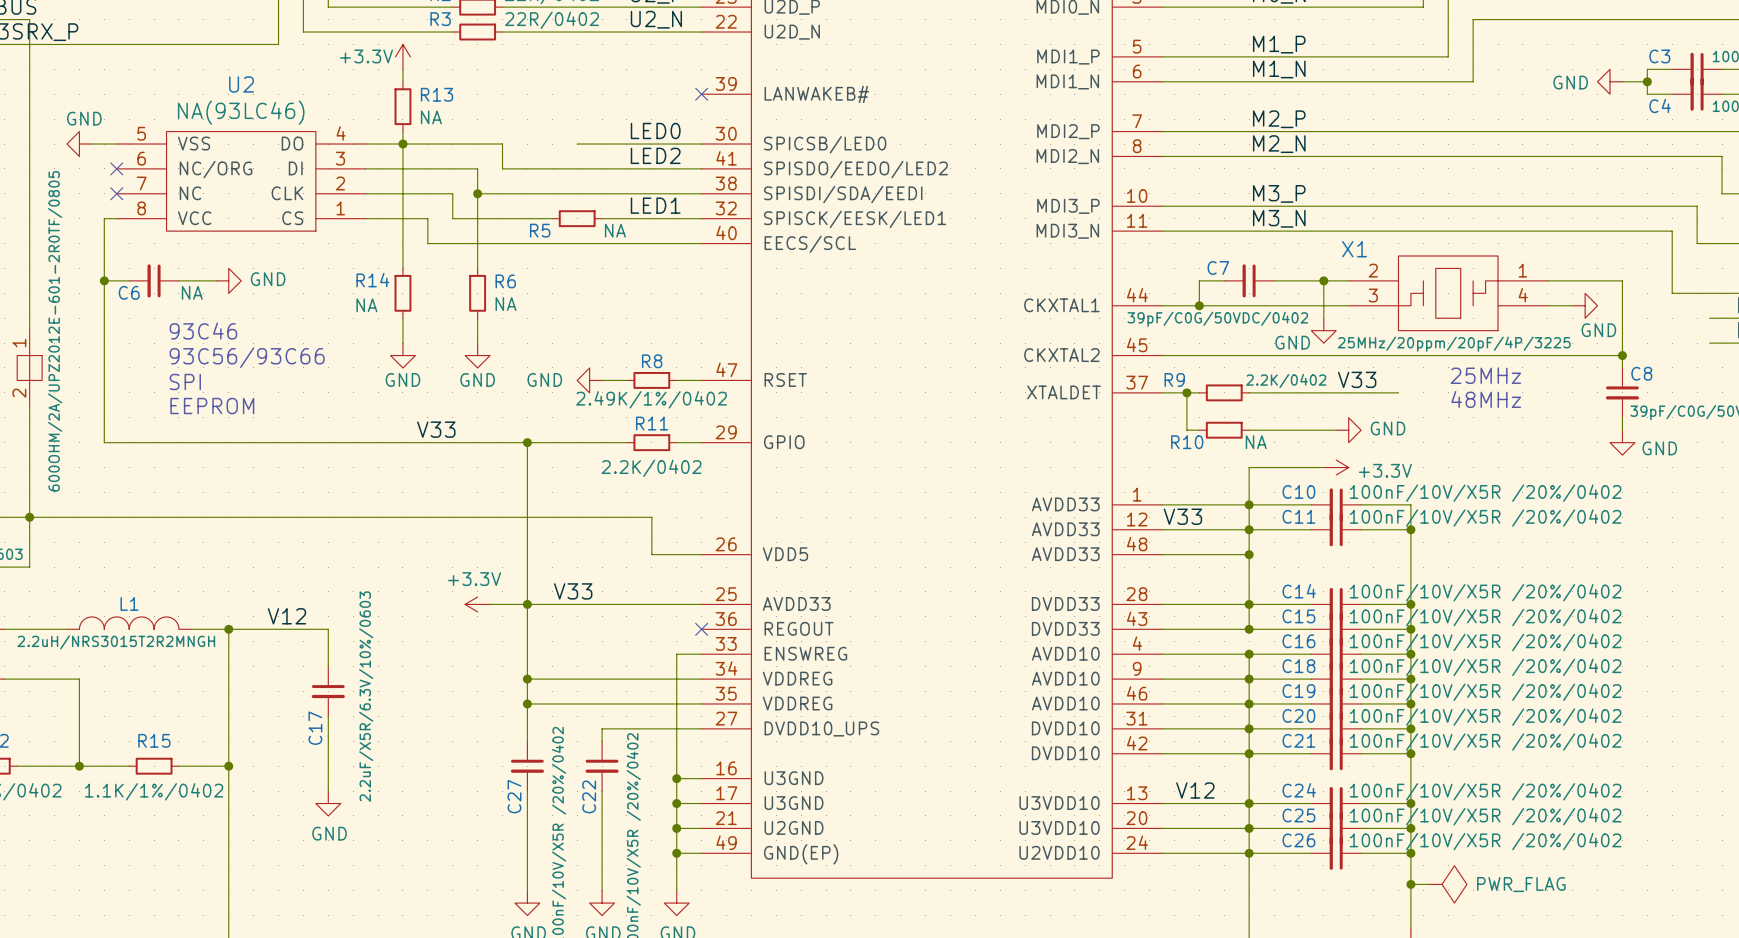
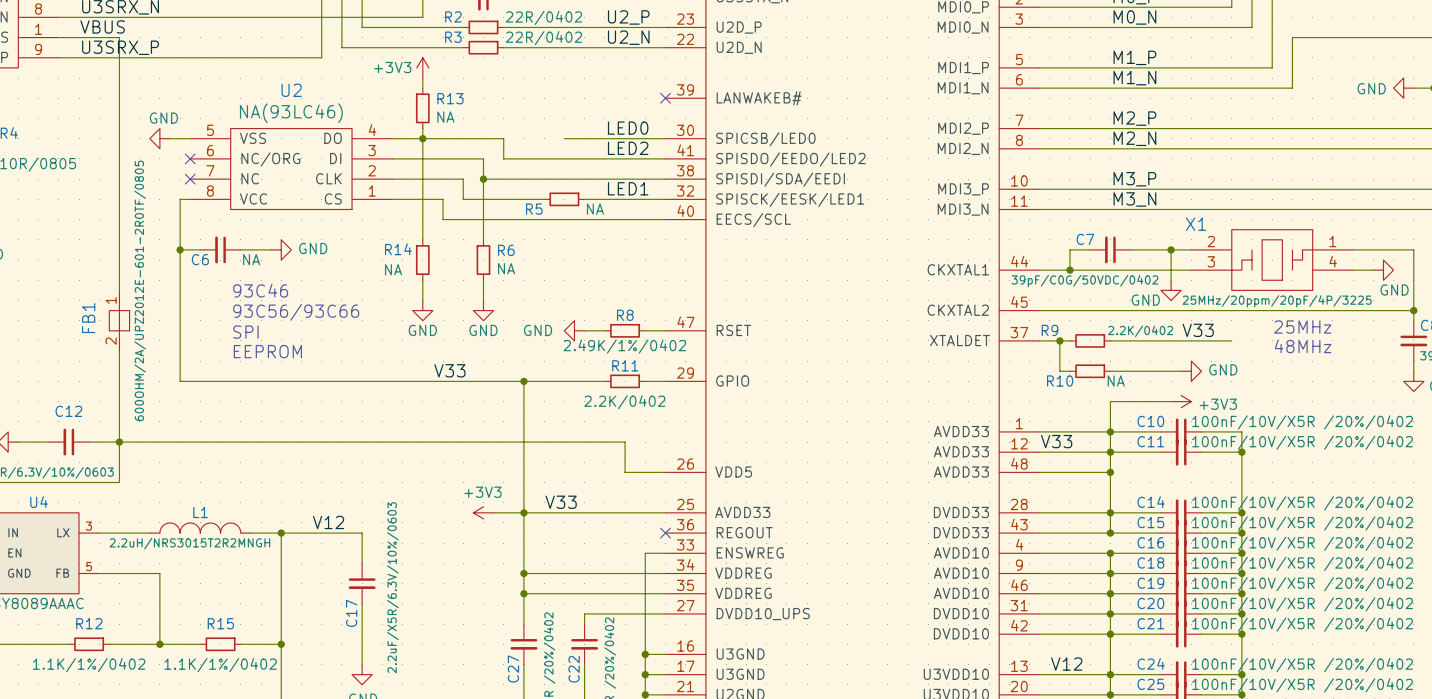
power symbol: +3.3V (402, 56) -> +3V3 (422, 67)
power symbol: +3.3V (1336, 467) -> +3V3 (1181, 401)
power symbol: +3.3V (477, 604) -> +3V3 (483, 512)

